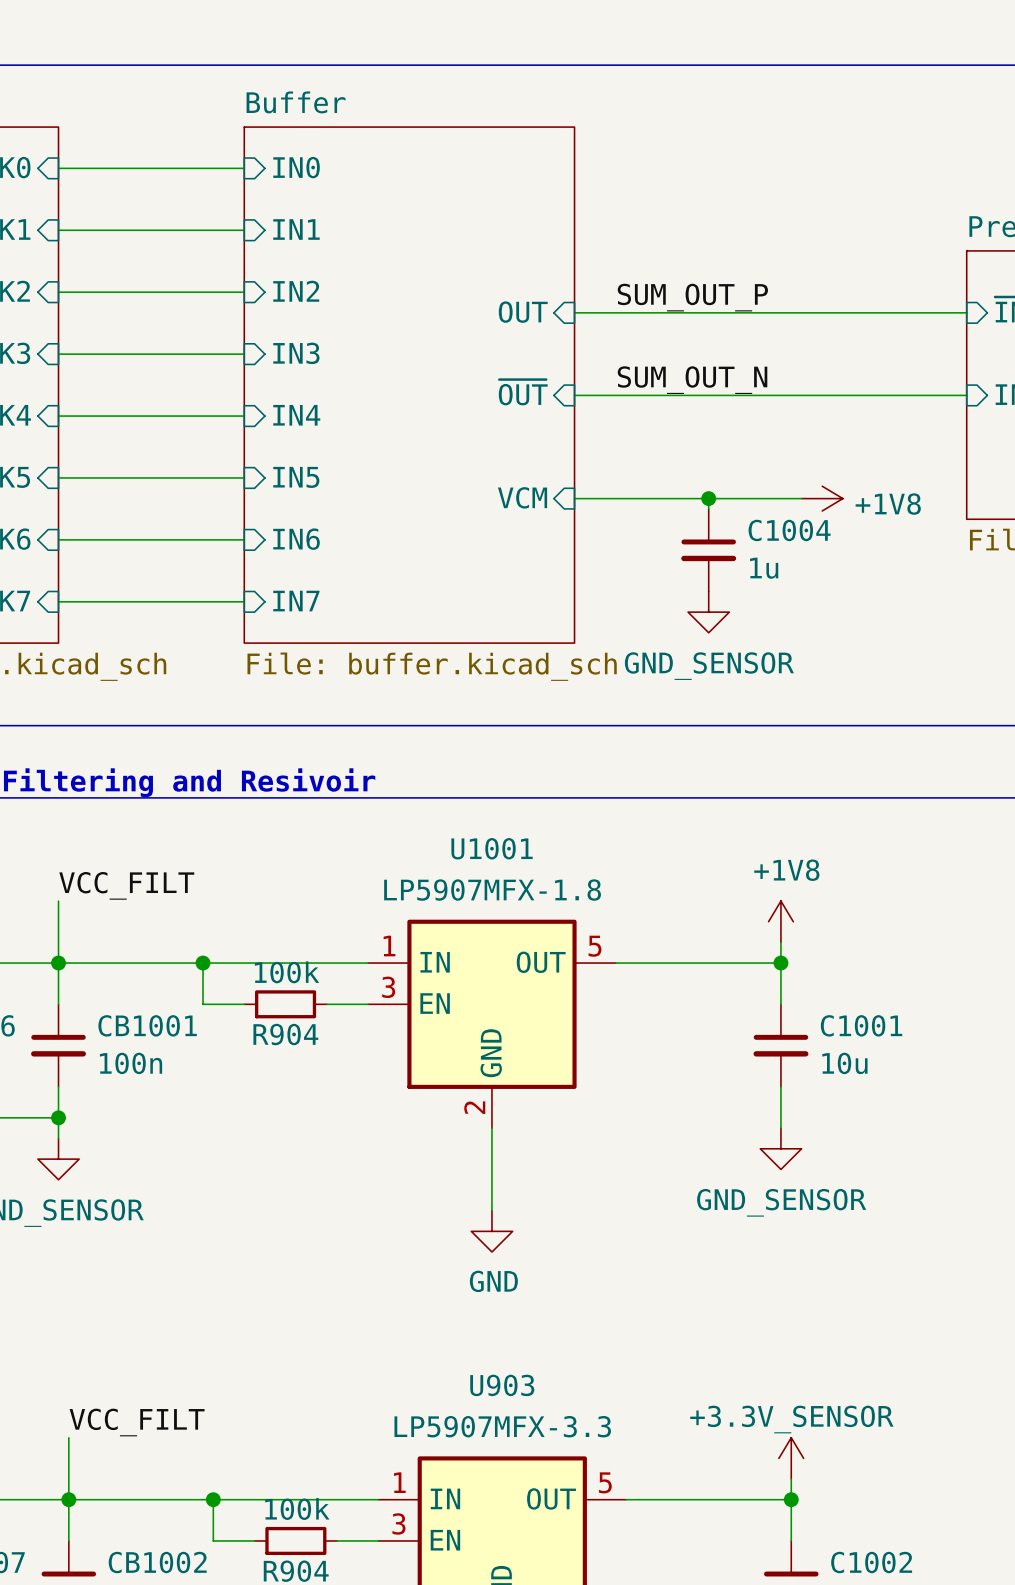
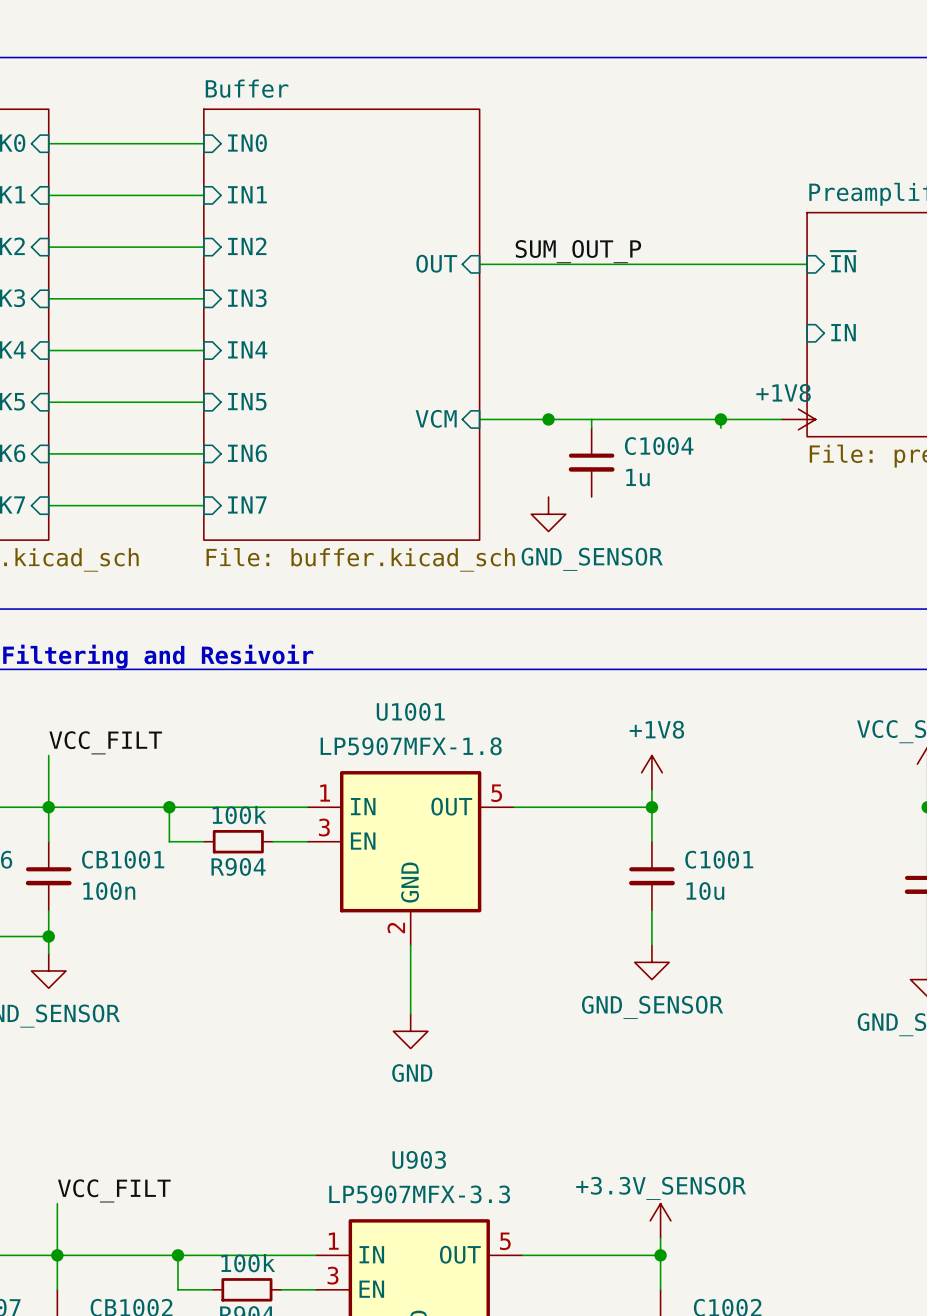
label: SUM_OUT_N (692, 380) -> none
sheet pin: ~{OUT} (523, 392) -> none
wire: (574, 395) (966, 395) -> none
junction position: (708, 498) -> (548, 419)
wire: none -> (669, 419) (781, 419)
power symbol position: +1V8 (822, 498) -> +1V8 (798, 419)
junction: none -> (720, 419)
power symbol text position: +1V8 (888, 504) -> +1V8 (783, 392)
power symbol position: GND_SENSOR (708, 612) -> GND_SENSOR (548, 514)

